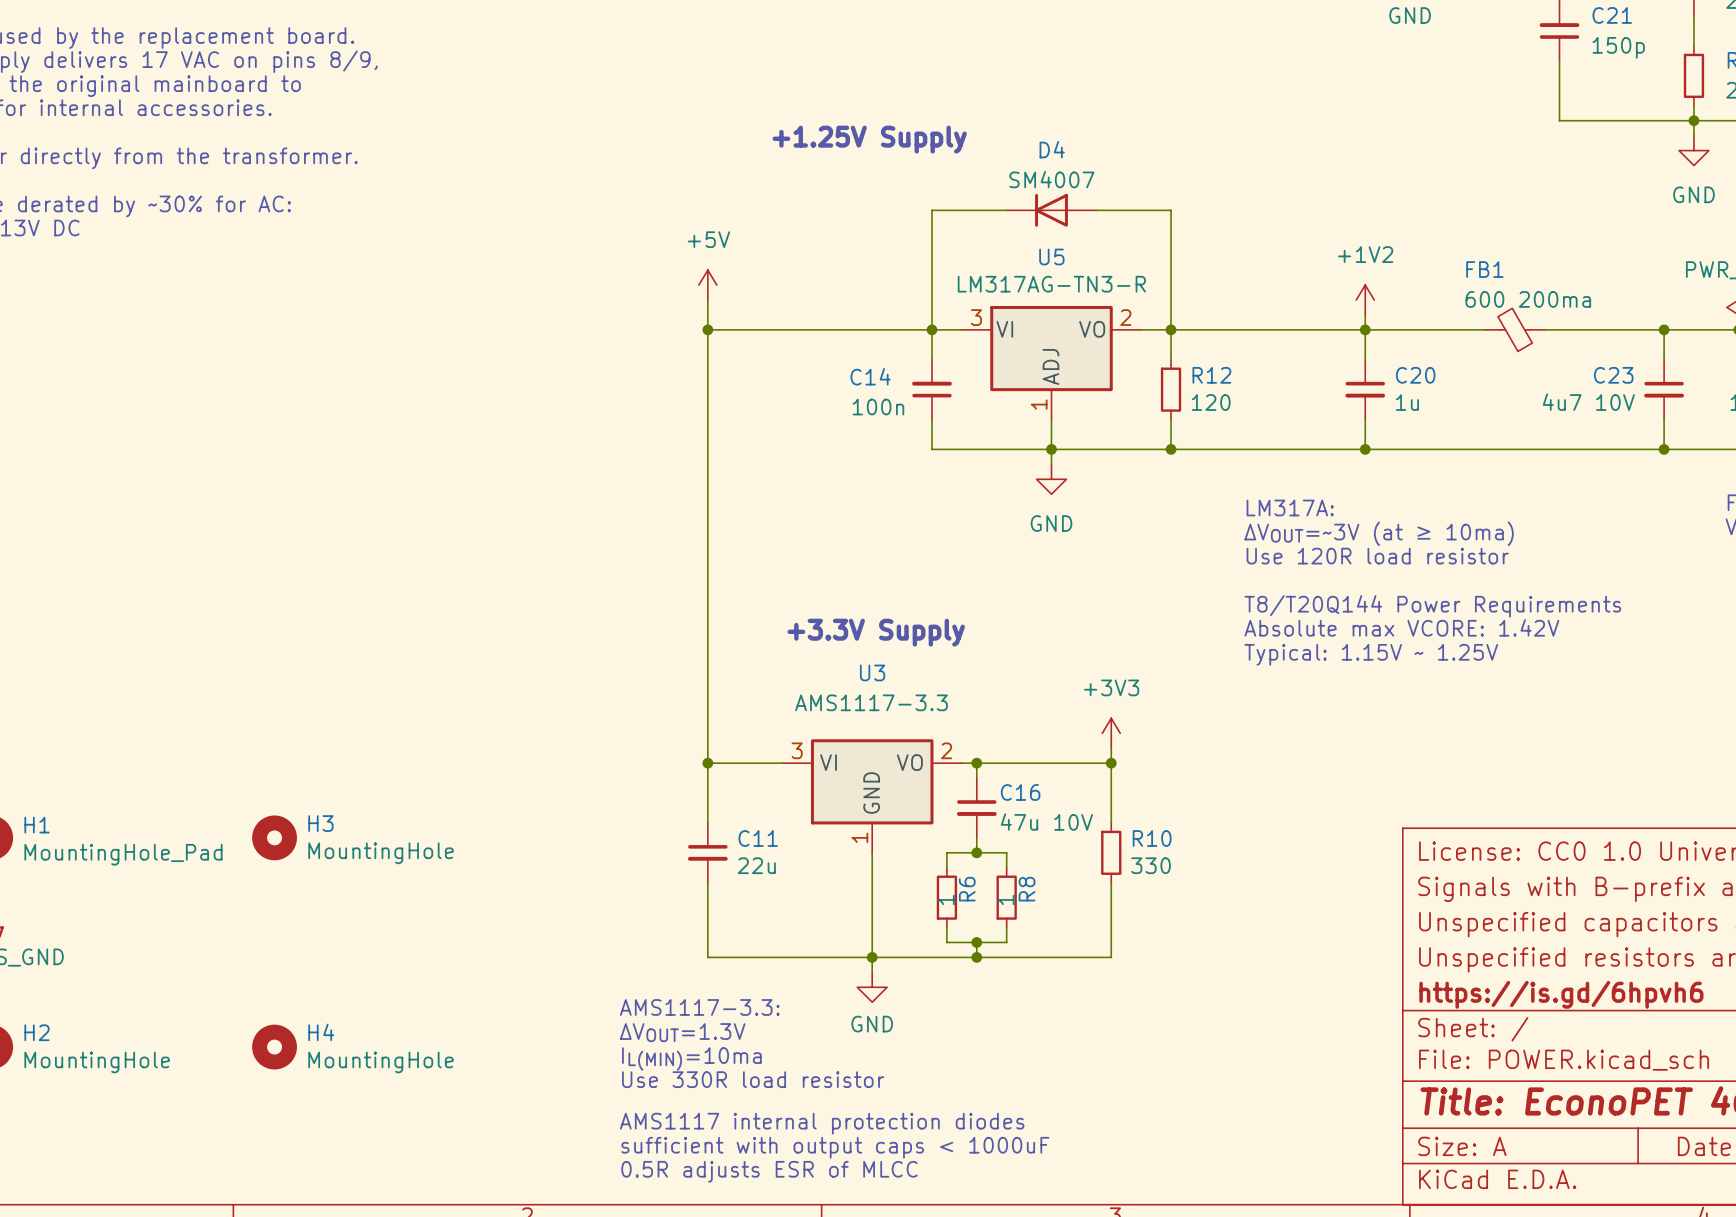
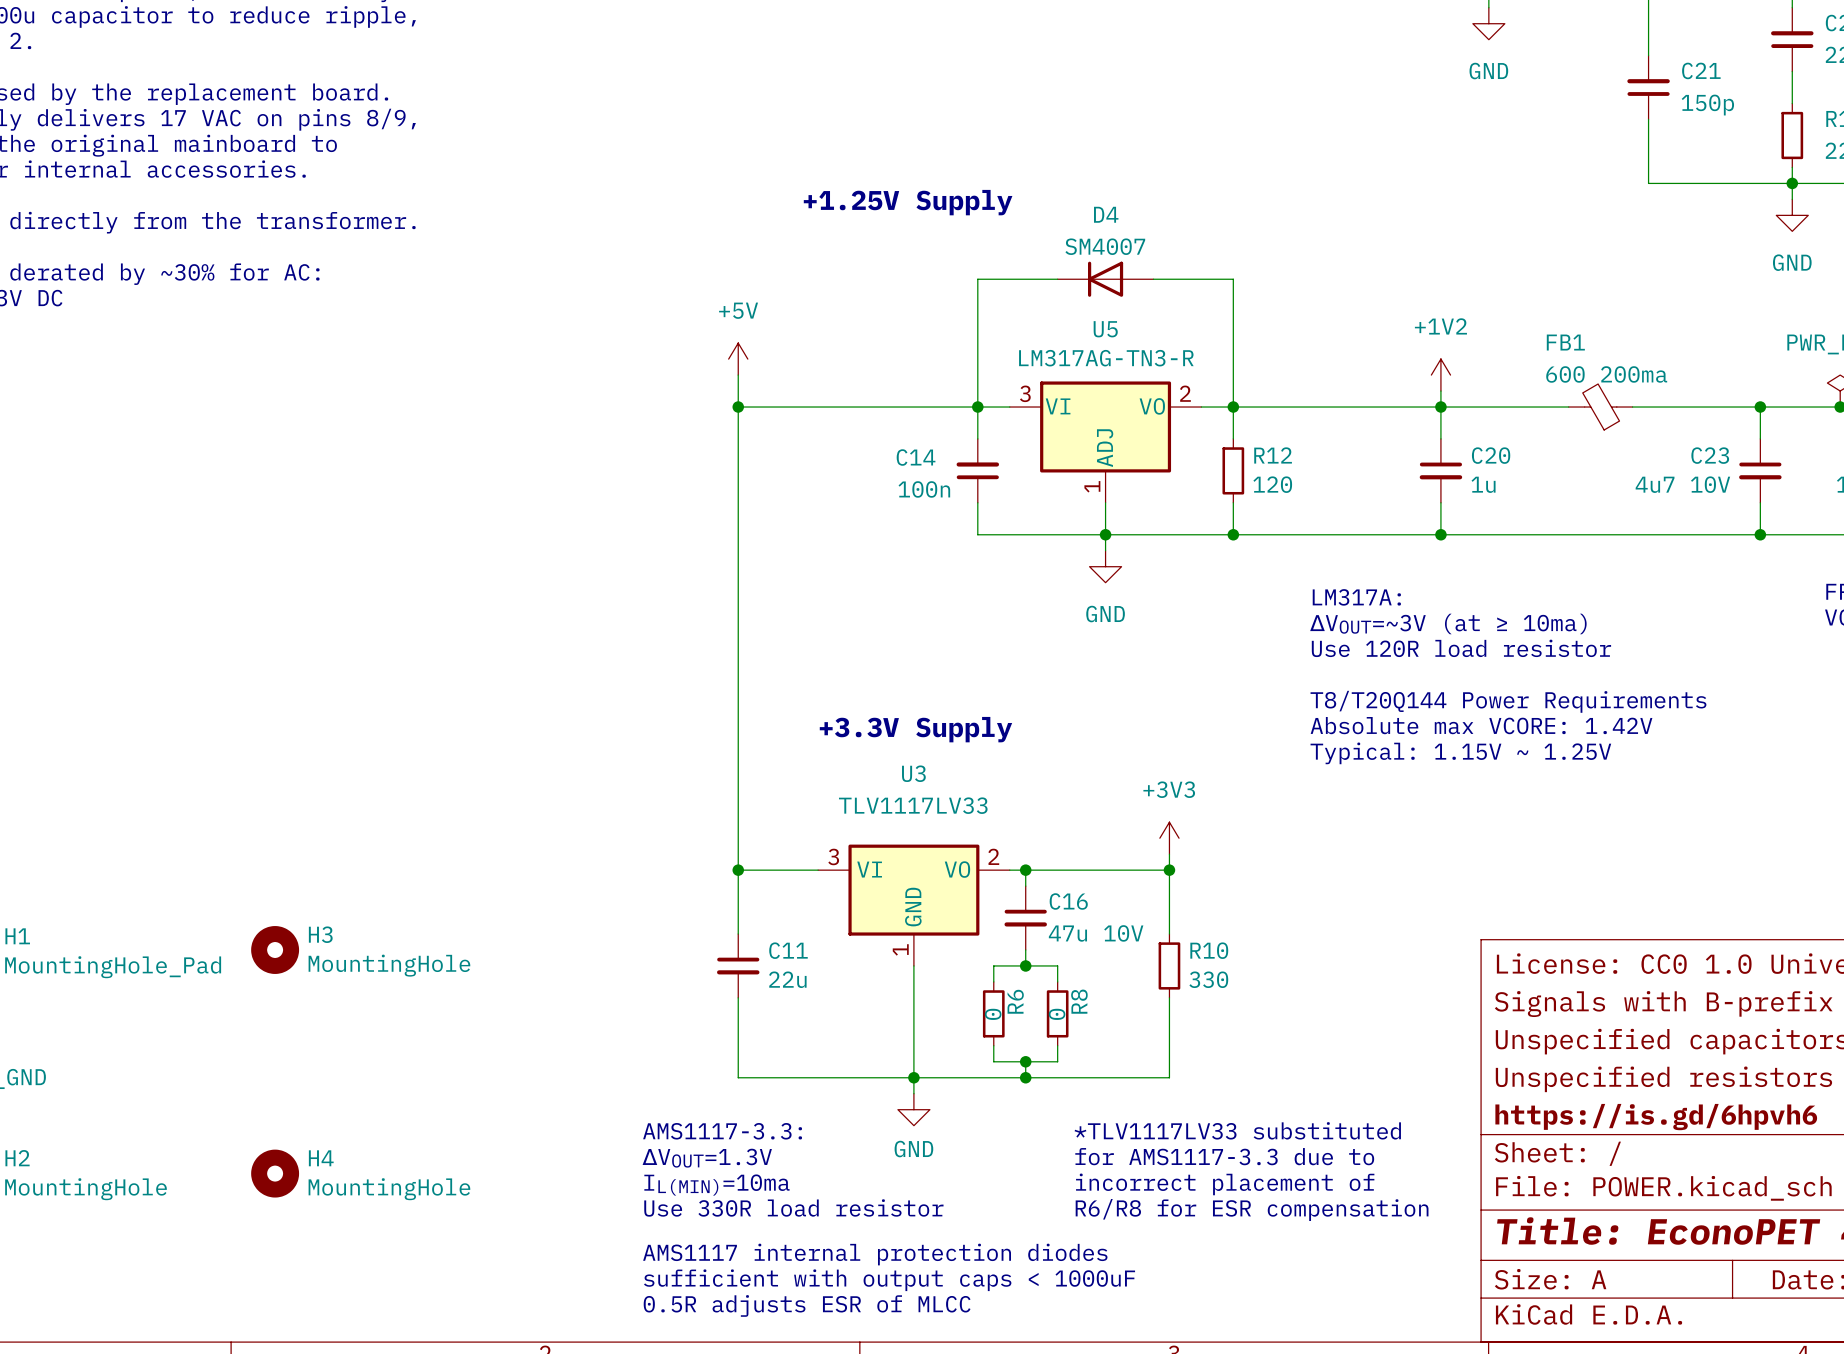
U3 value: AMS1117-3.3 (871, 702) -> TLV1117LV33 (913, 805)
R6 value: 1 (946, 899) -> 0 (993, 1014)
R8 value: 1 (1006, 899) -> 0 (1057, 1014)
text: none -> *TLV1117LV33 substituted (1237, 1130)
text: none -> for AMS1117-3.3 due to (1224, 1156)
text: none -> incorrect placement of (1225, 1184)
text: none -> R6/R8 for ESR compensation (1252, 1209)

